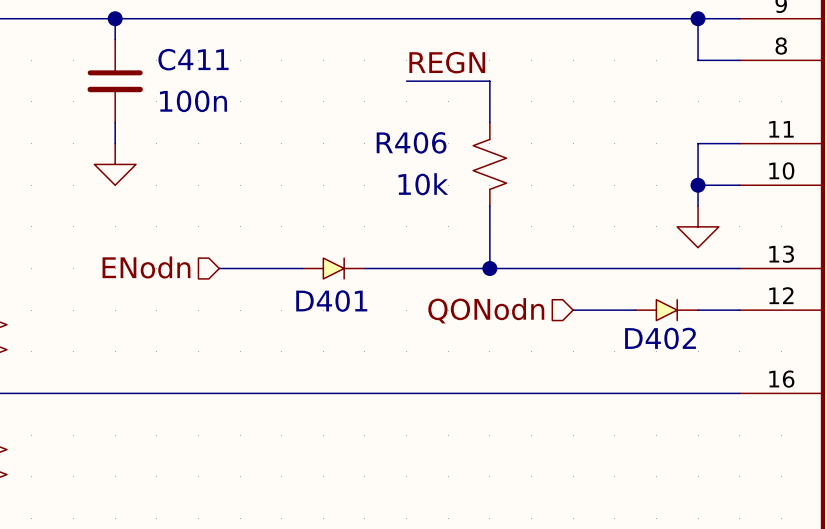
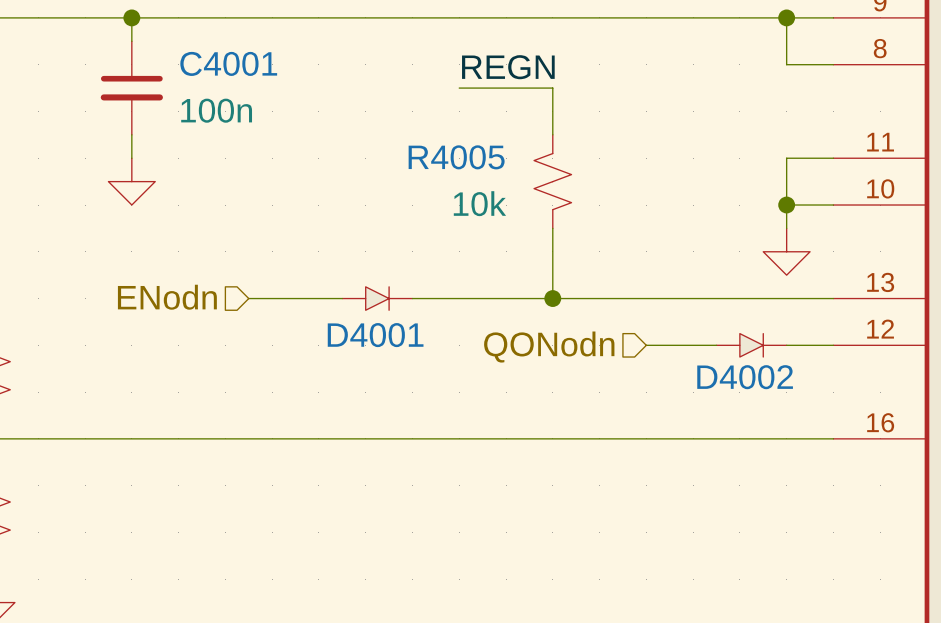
C411 name: C411 (193, 59) -> C4001 (228, 63)
R406 name: R406 (411, 142) -> R4005 (456, 157)
D401 name: D401 (331, 301) -> D4001 (375, 335)
D402 name: D402 (660, 338) -> D4002 (745, 377)

